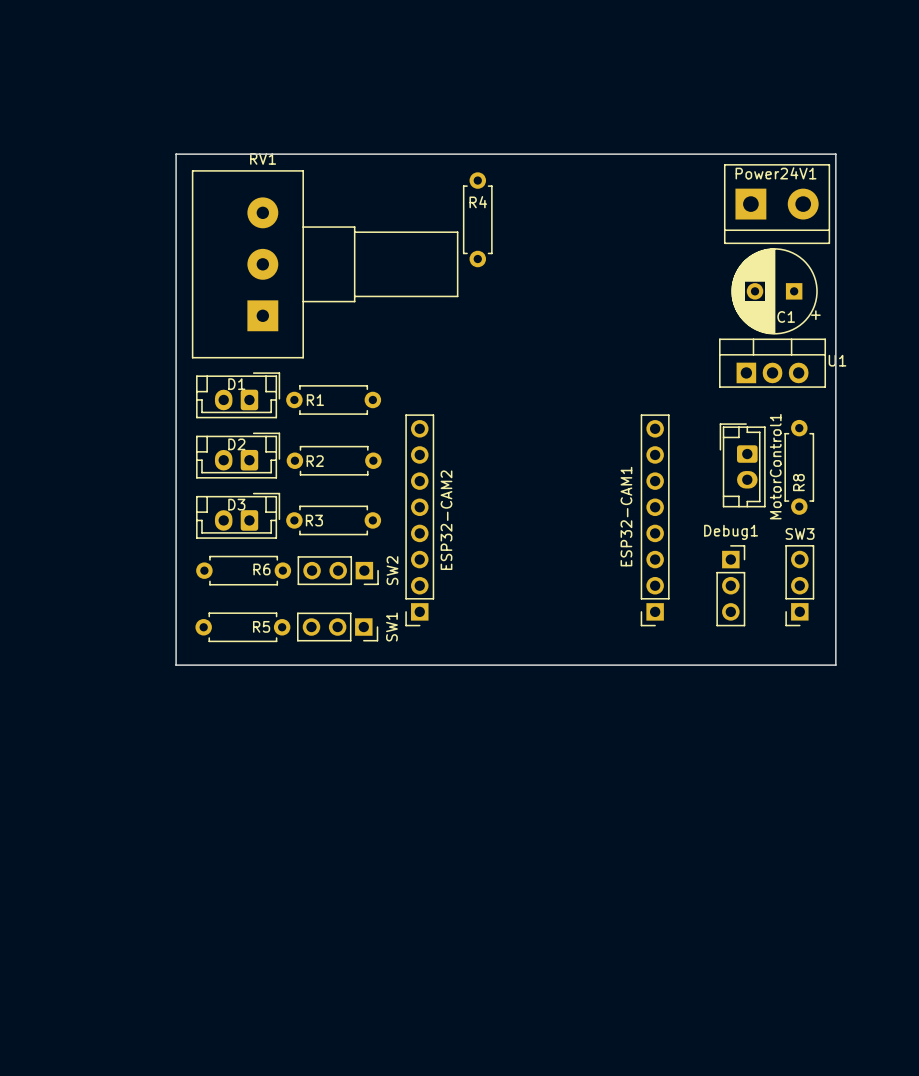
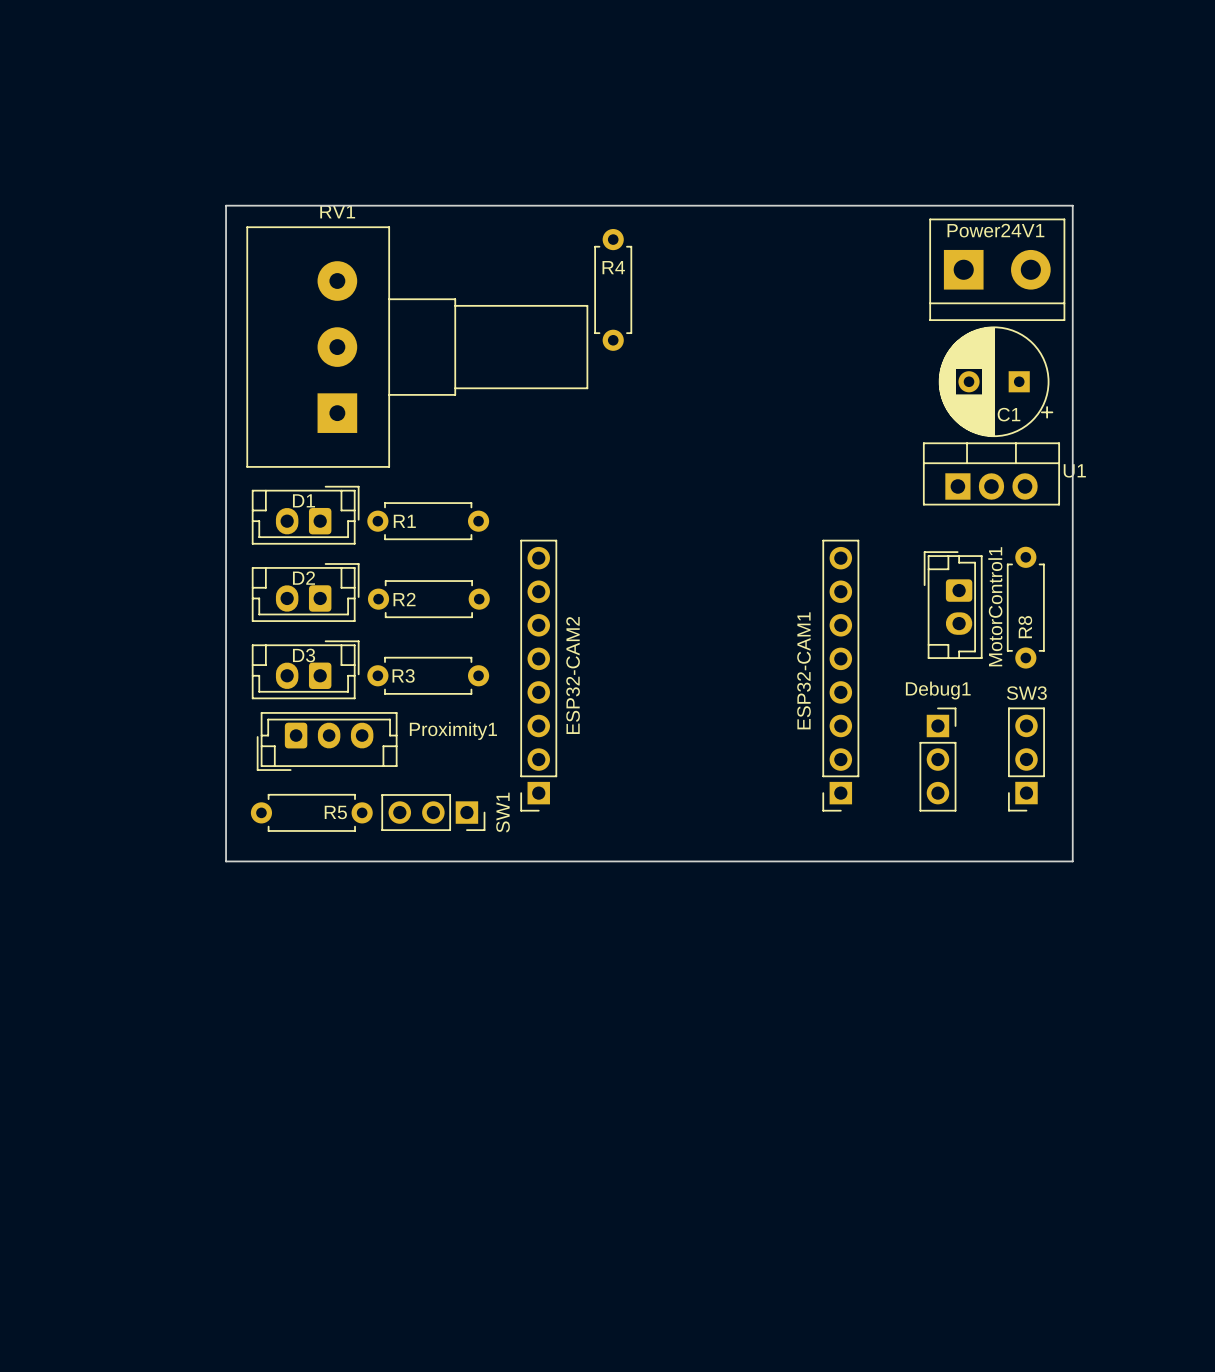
R6: (243, 570) -> none
SW2: (338, 570) -> none
Proximity1: none -> (327, 741)

